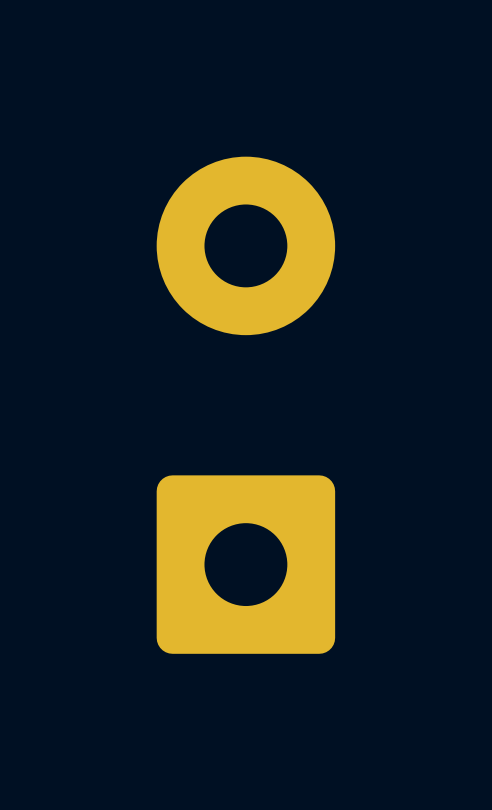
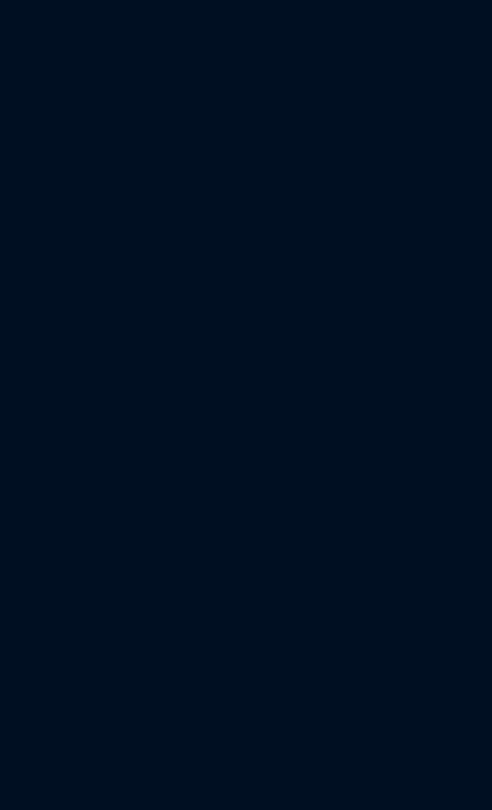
part: (245, 405) -> none

